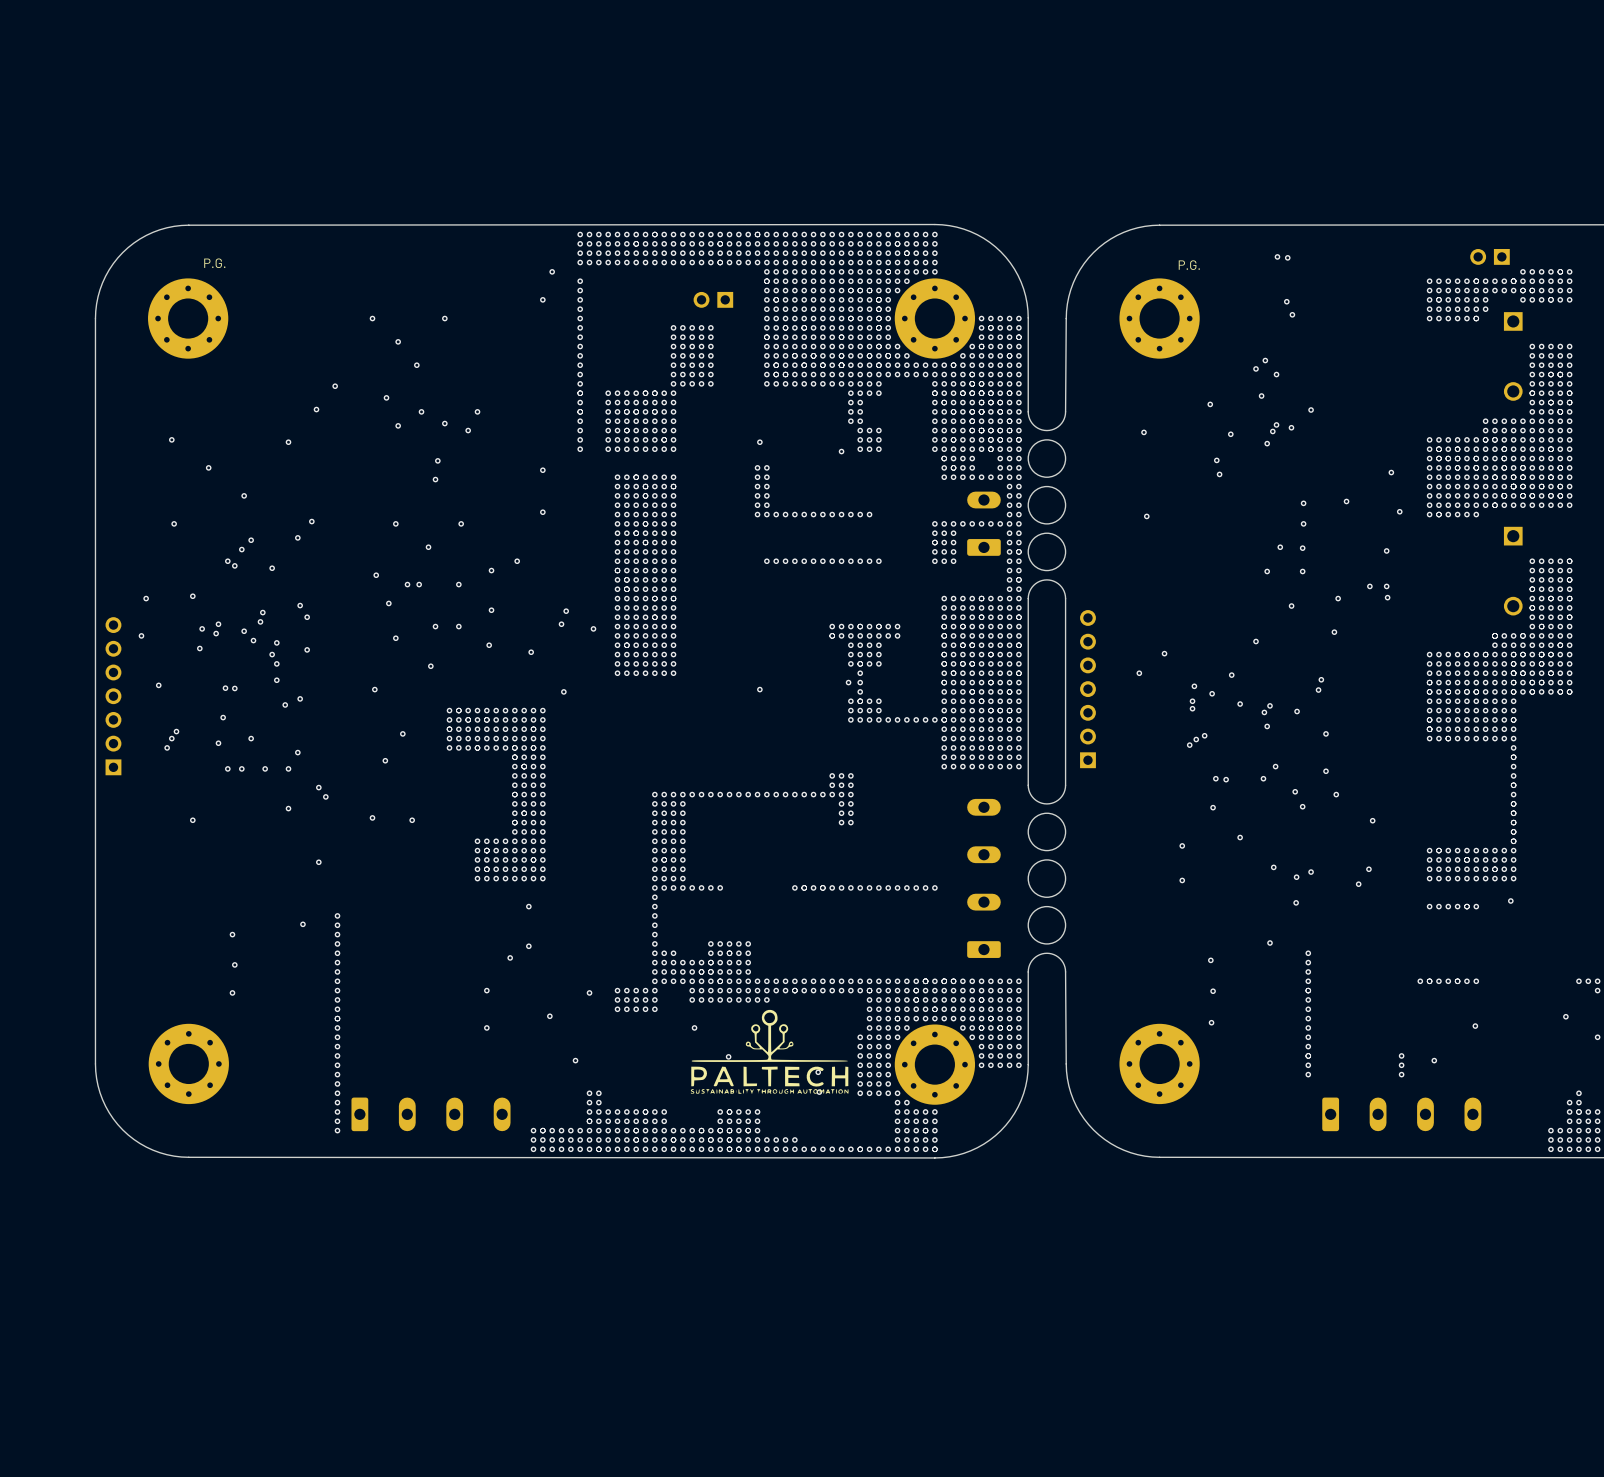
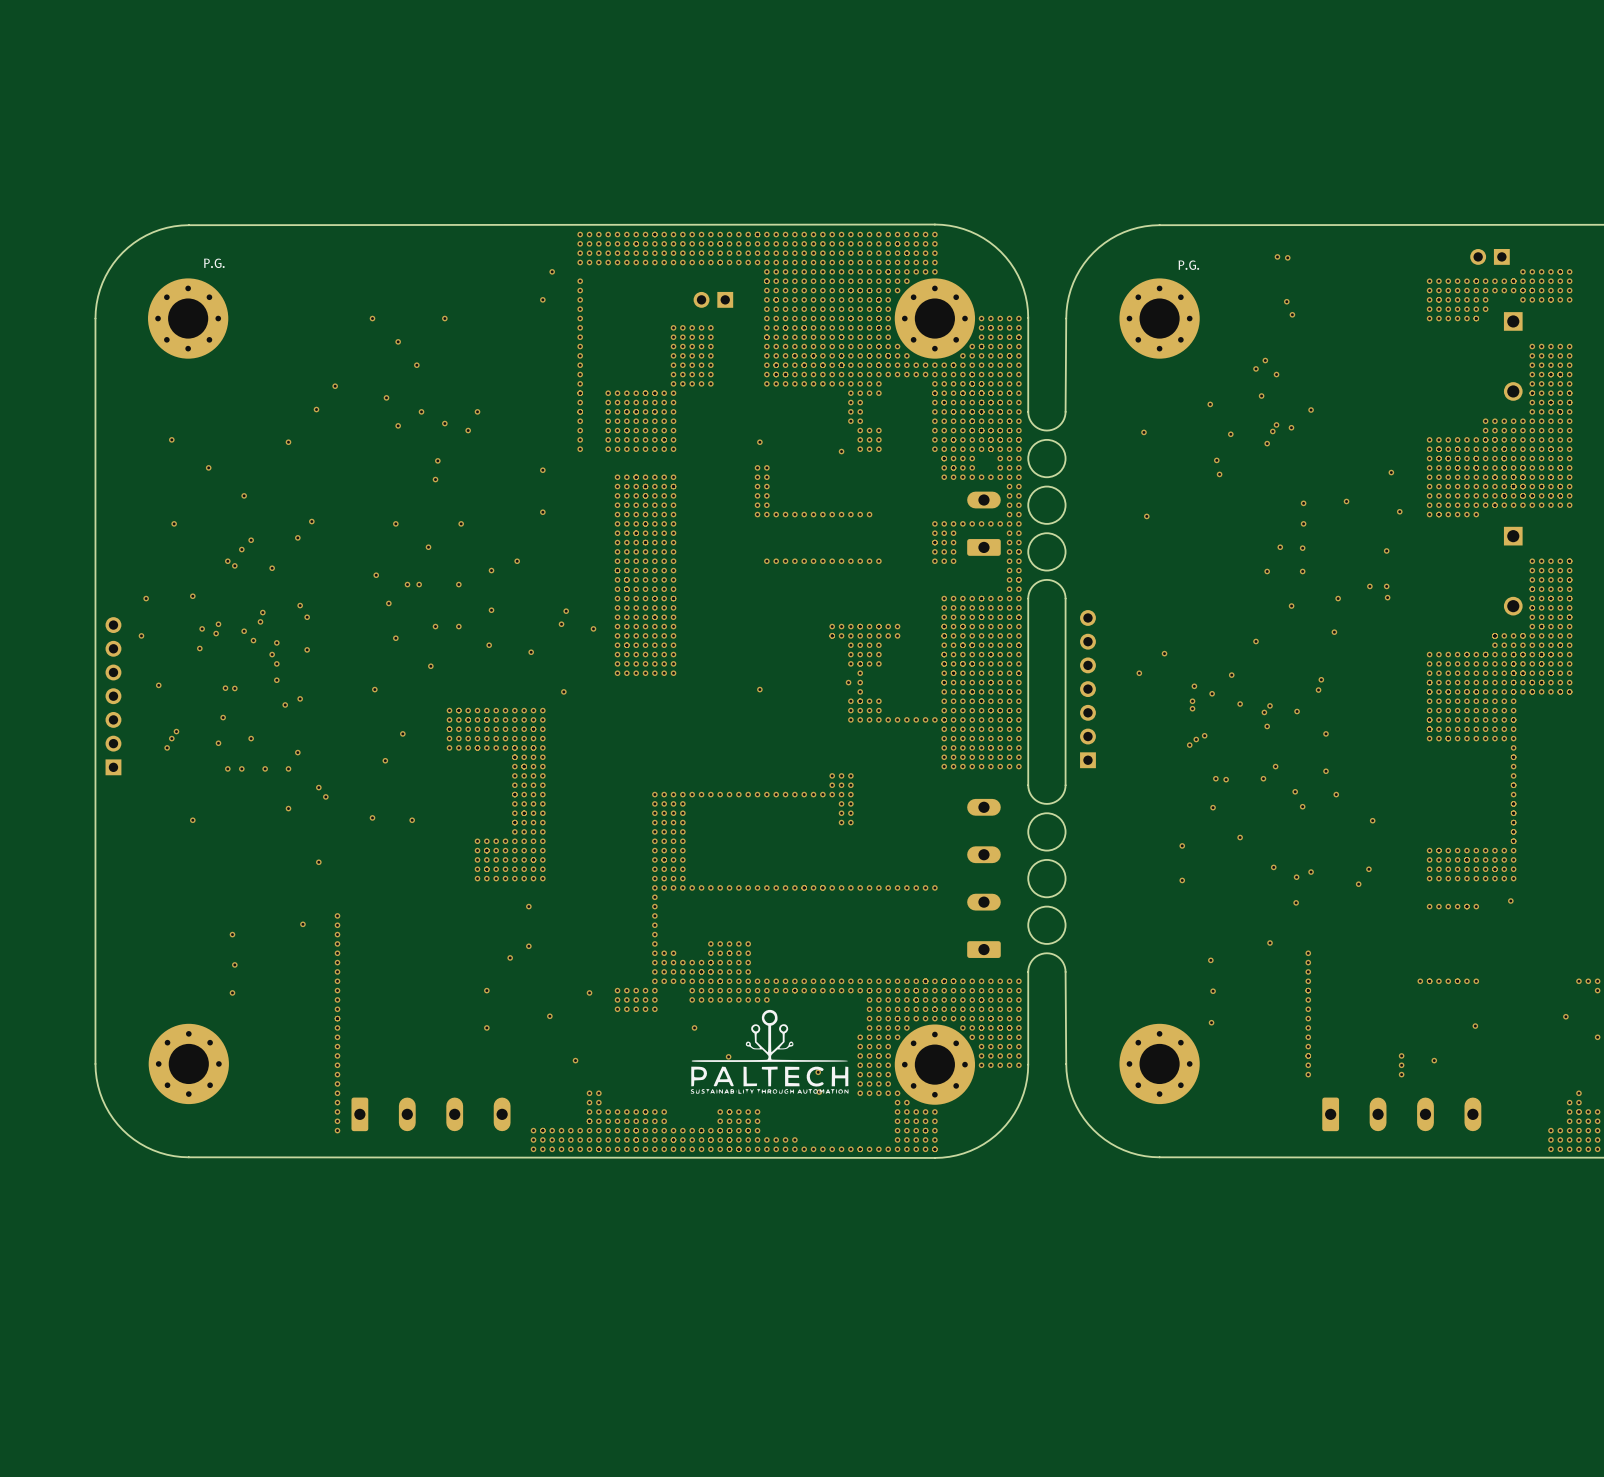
via: none -> (729, 887)
via: none -> (738, 887)
via: none -> (748, 887)
via: none -> (757, 887)
via: none -> (766, 887)
via: none -> (776, 887)
via: none -> (785, 887)

